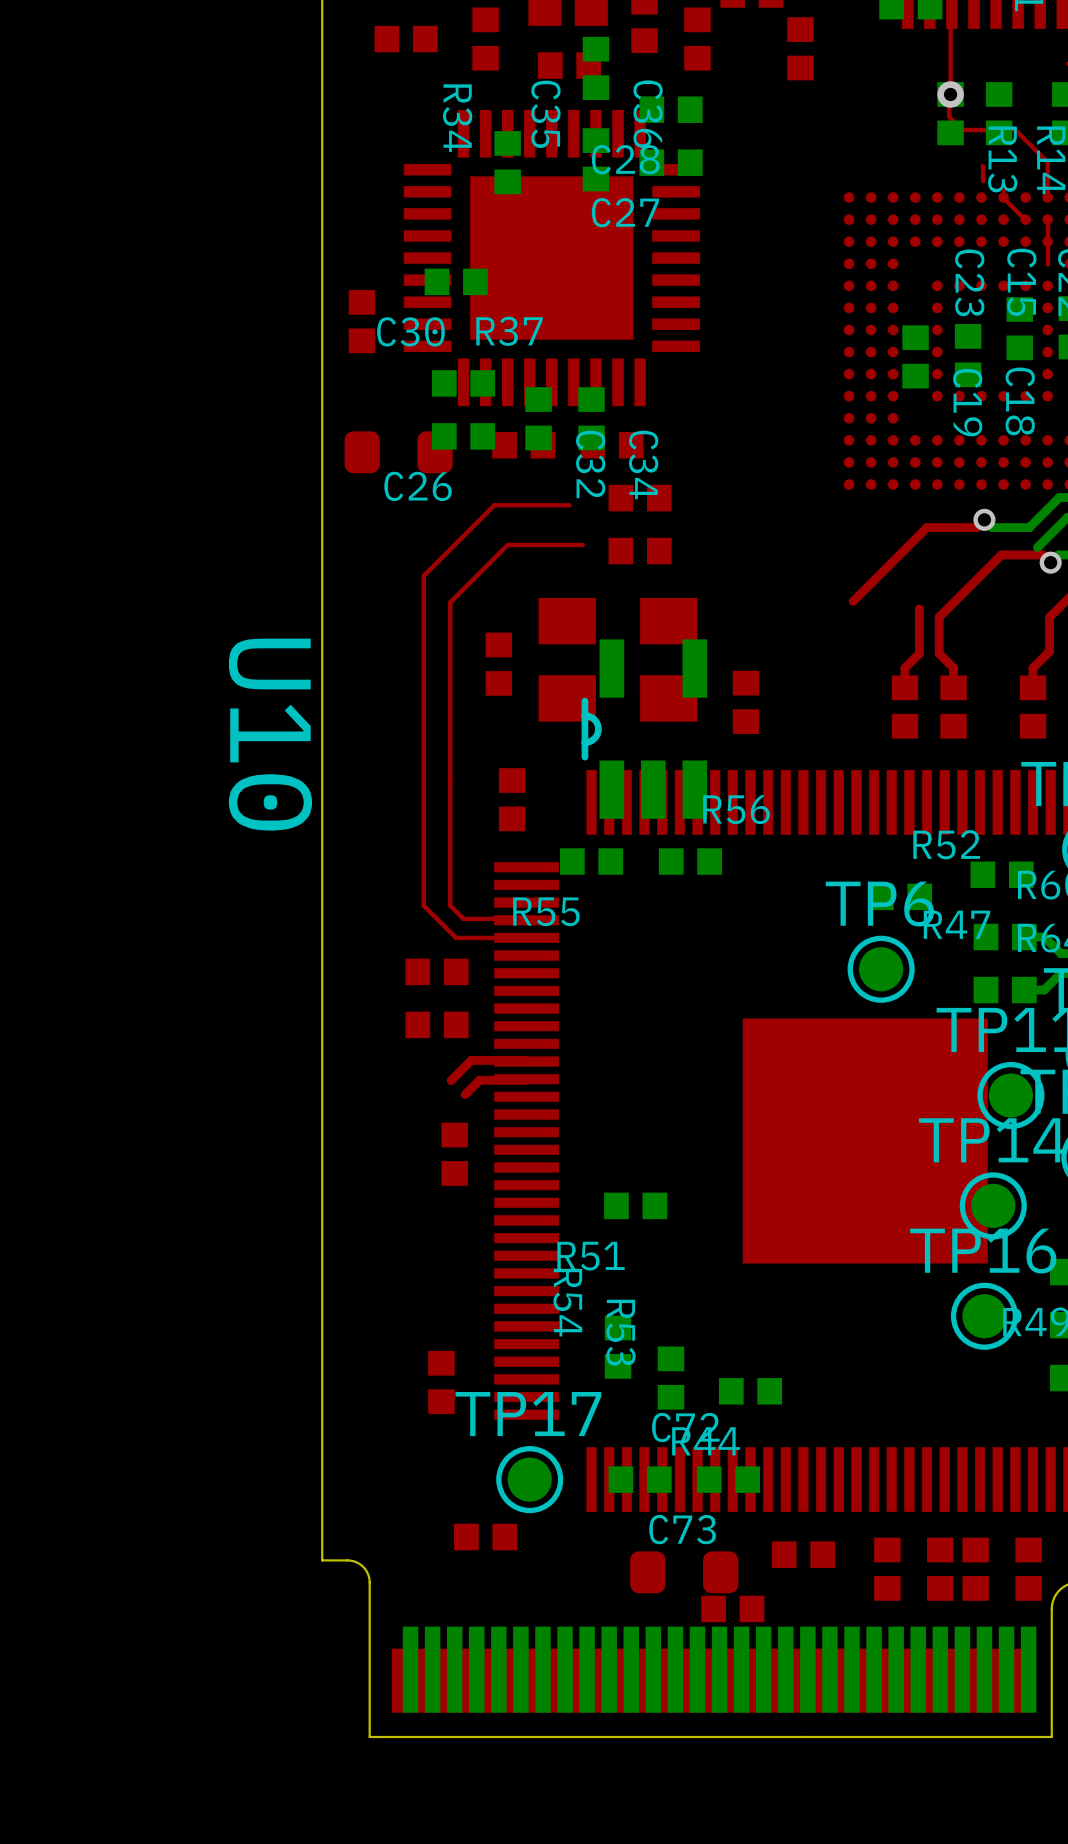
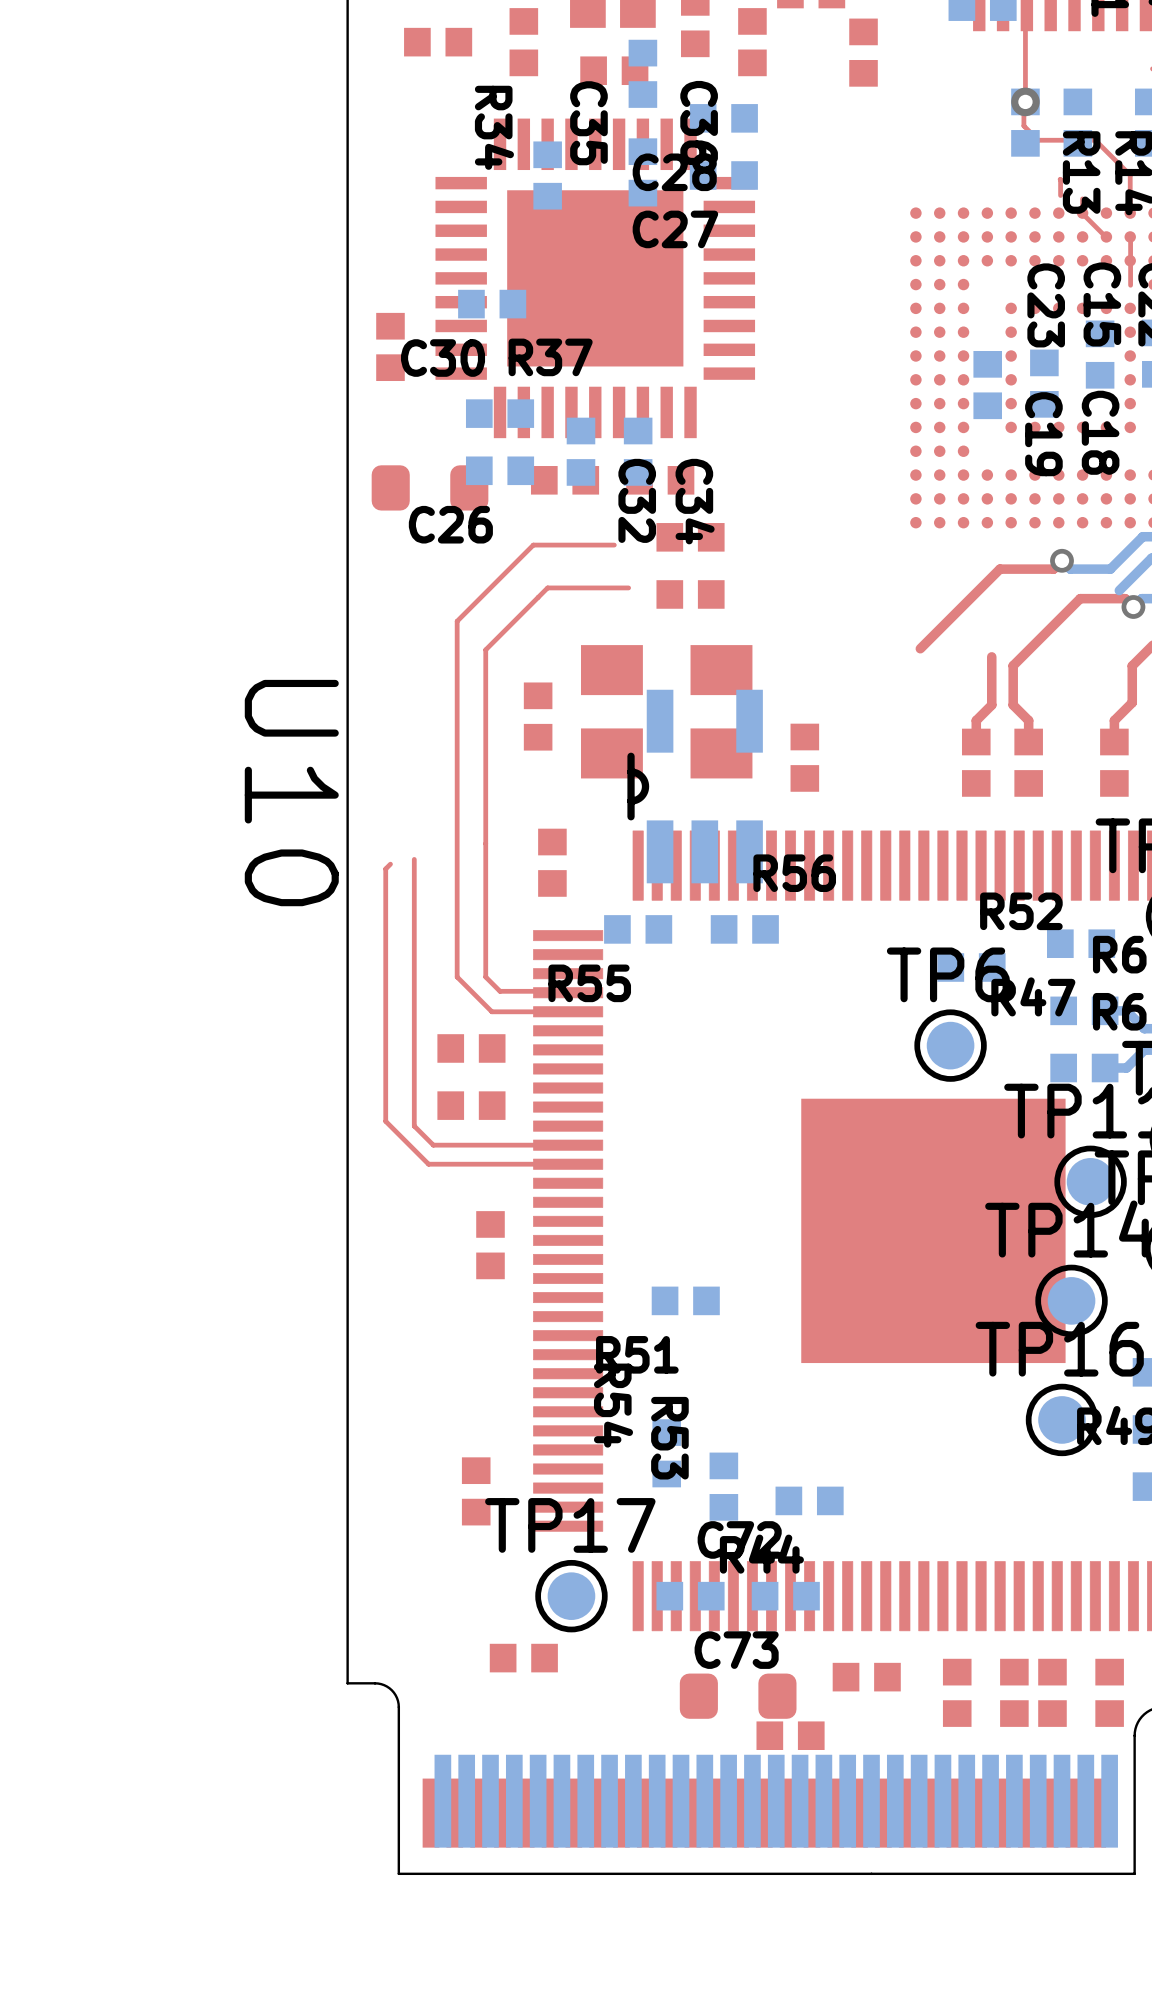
top track: (526, 1061) (471, 1060) (451, 1080) -> (568, 1145) (433, 1145) (414, 1126) (414, 859)
top track: (526, 1079) (479, 1080) (465, 1094) -> (568, 1164) (428, 1164) (385, 1121) (385, 868) (390, 864)

